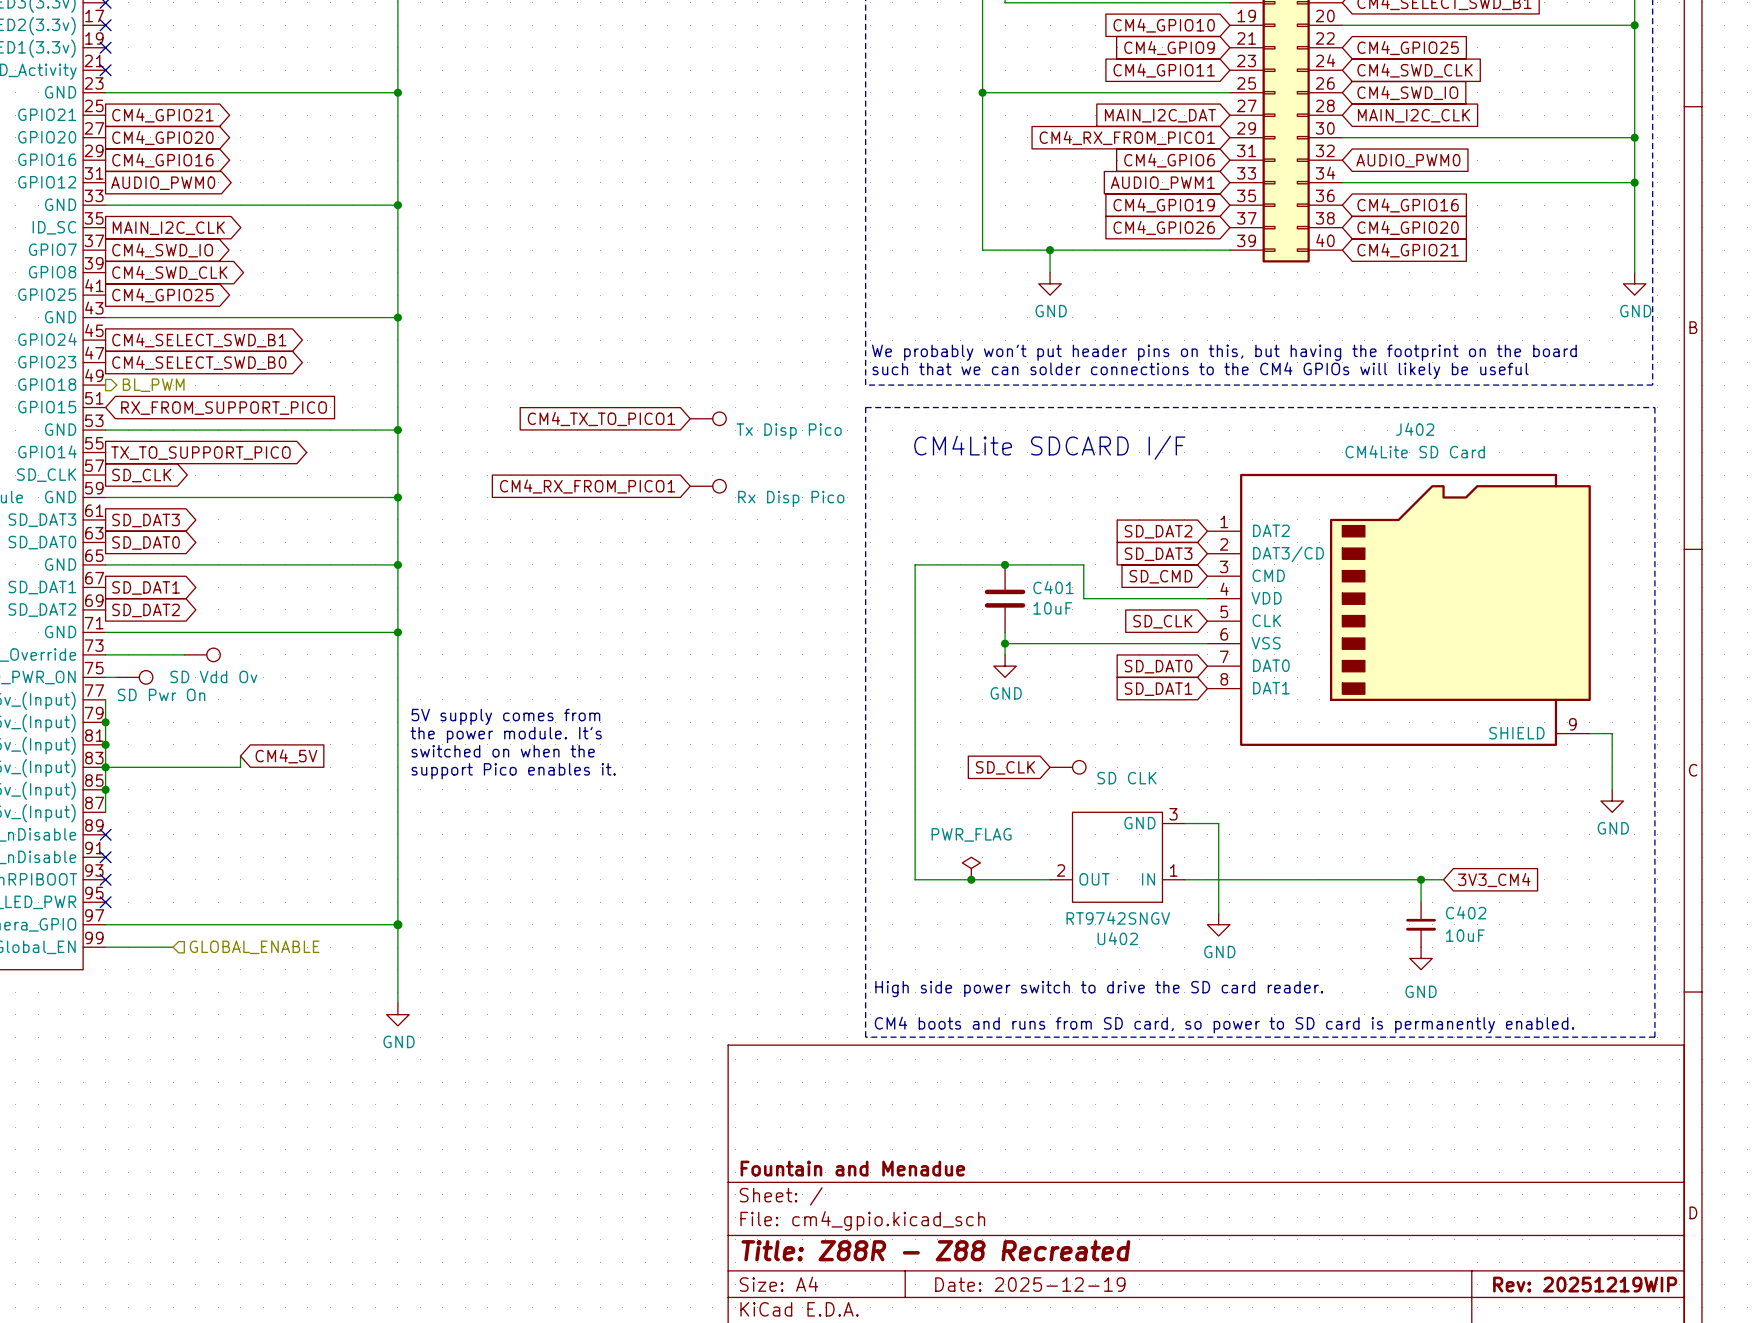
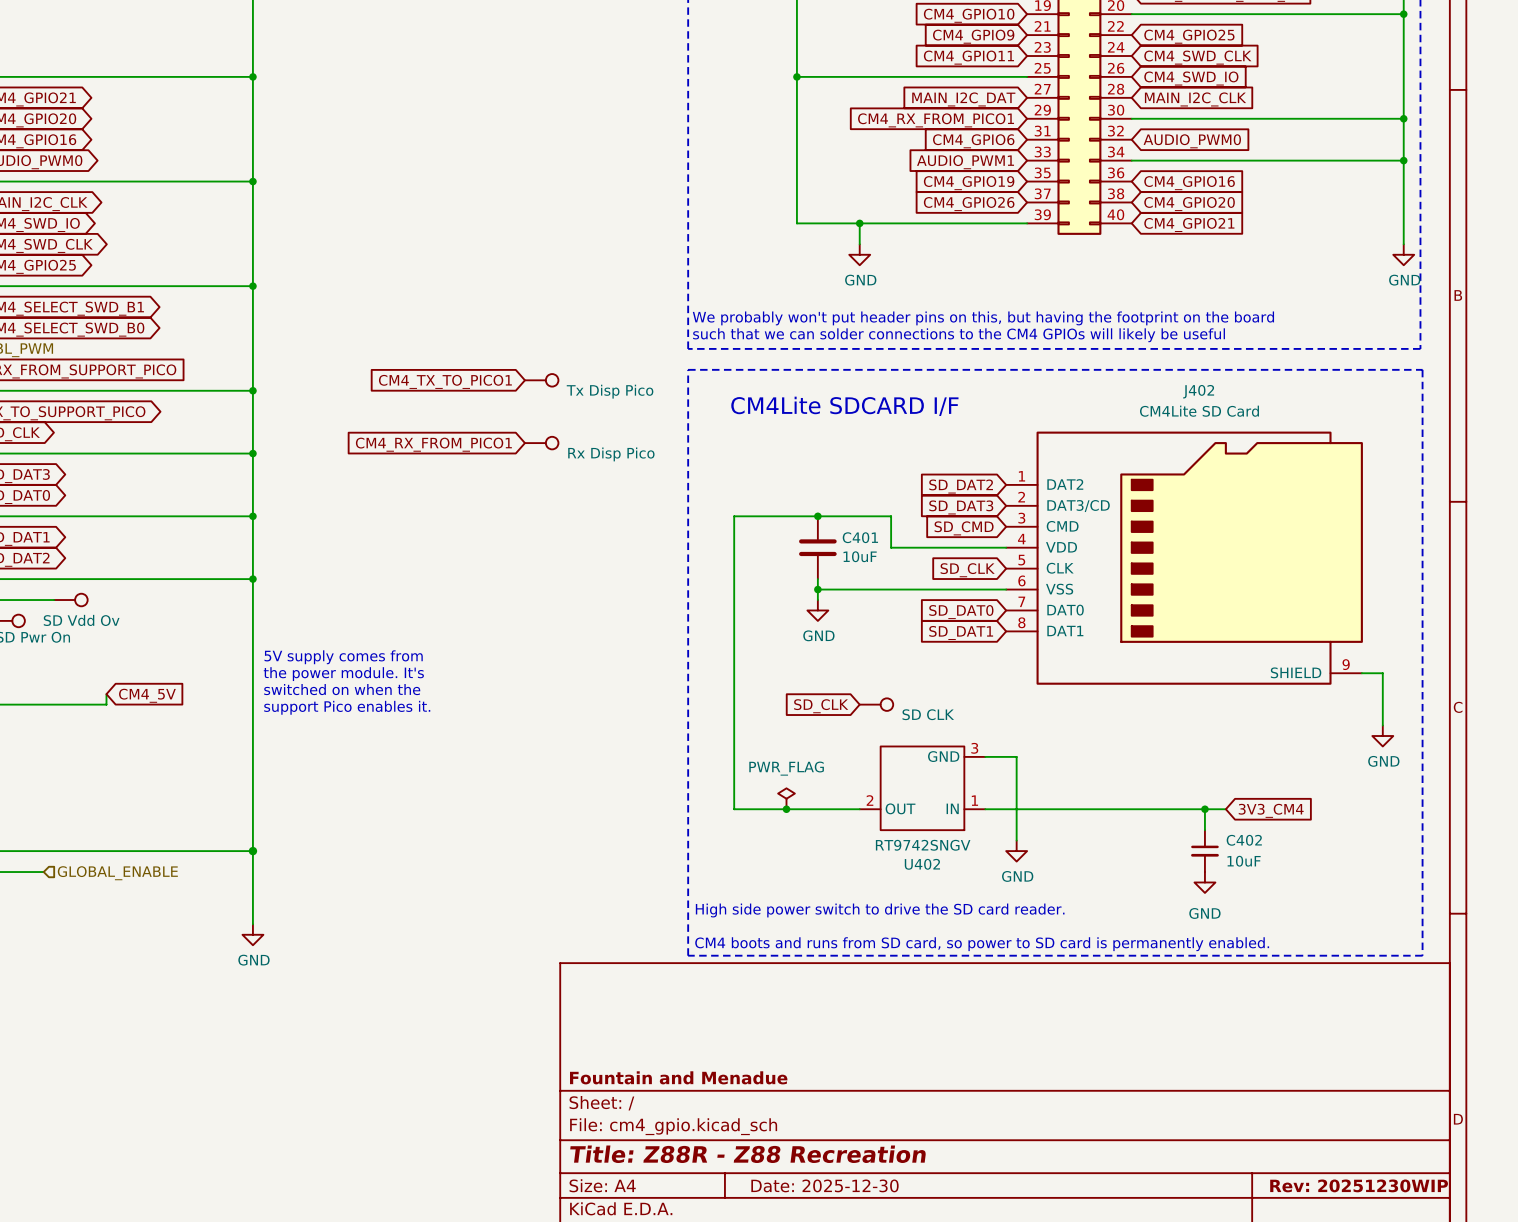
title block: Title: Z88R - Z88 Recreated (935, 1250) -> Title: Z88R - Z88 Recreation (748, 1154)
title block: Date: 2025-12-19 (1030, 1284) -> Date: 2025-12-30 (824, 1185)
title block: Rev: 20251219WIP (1585, 1284) -> Rev: 20251230WIP (1359, 1185)

